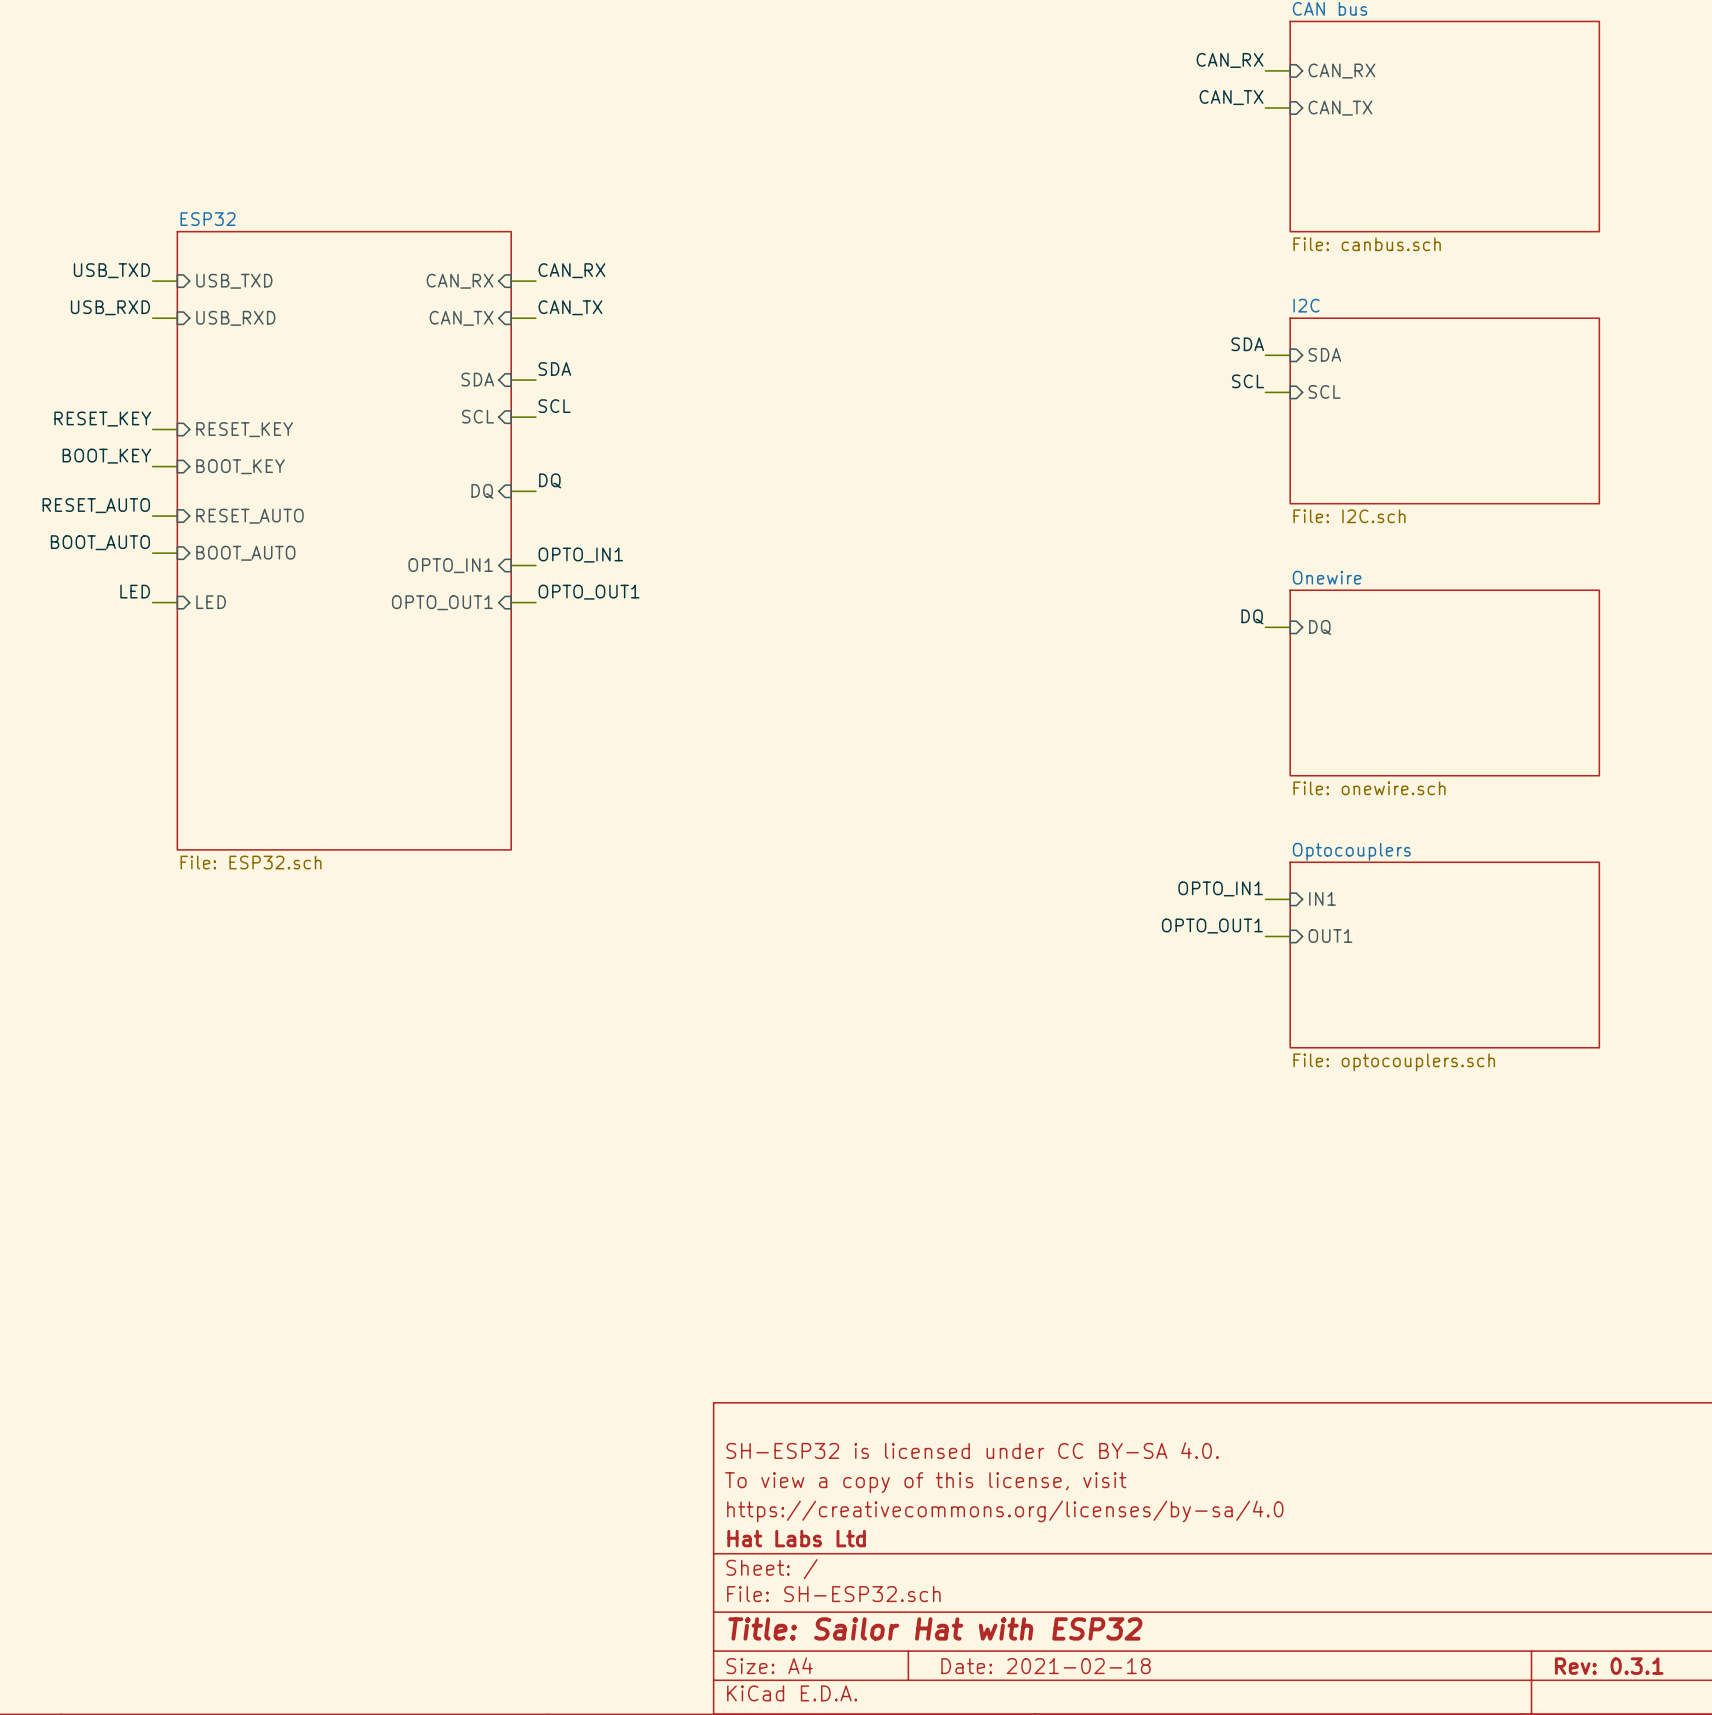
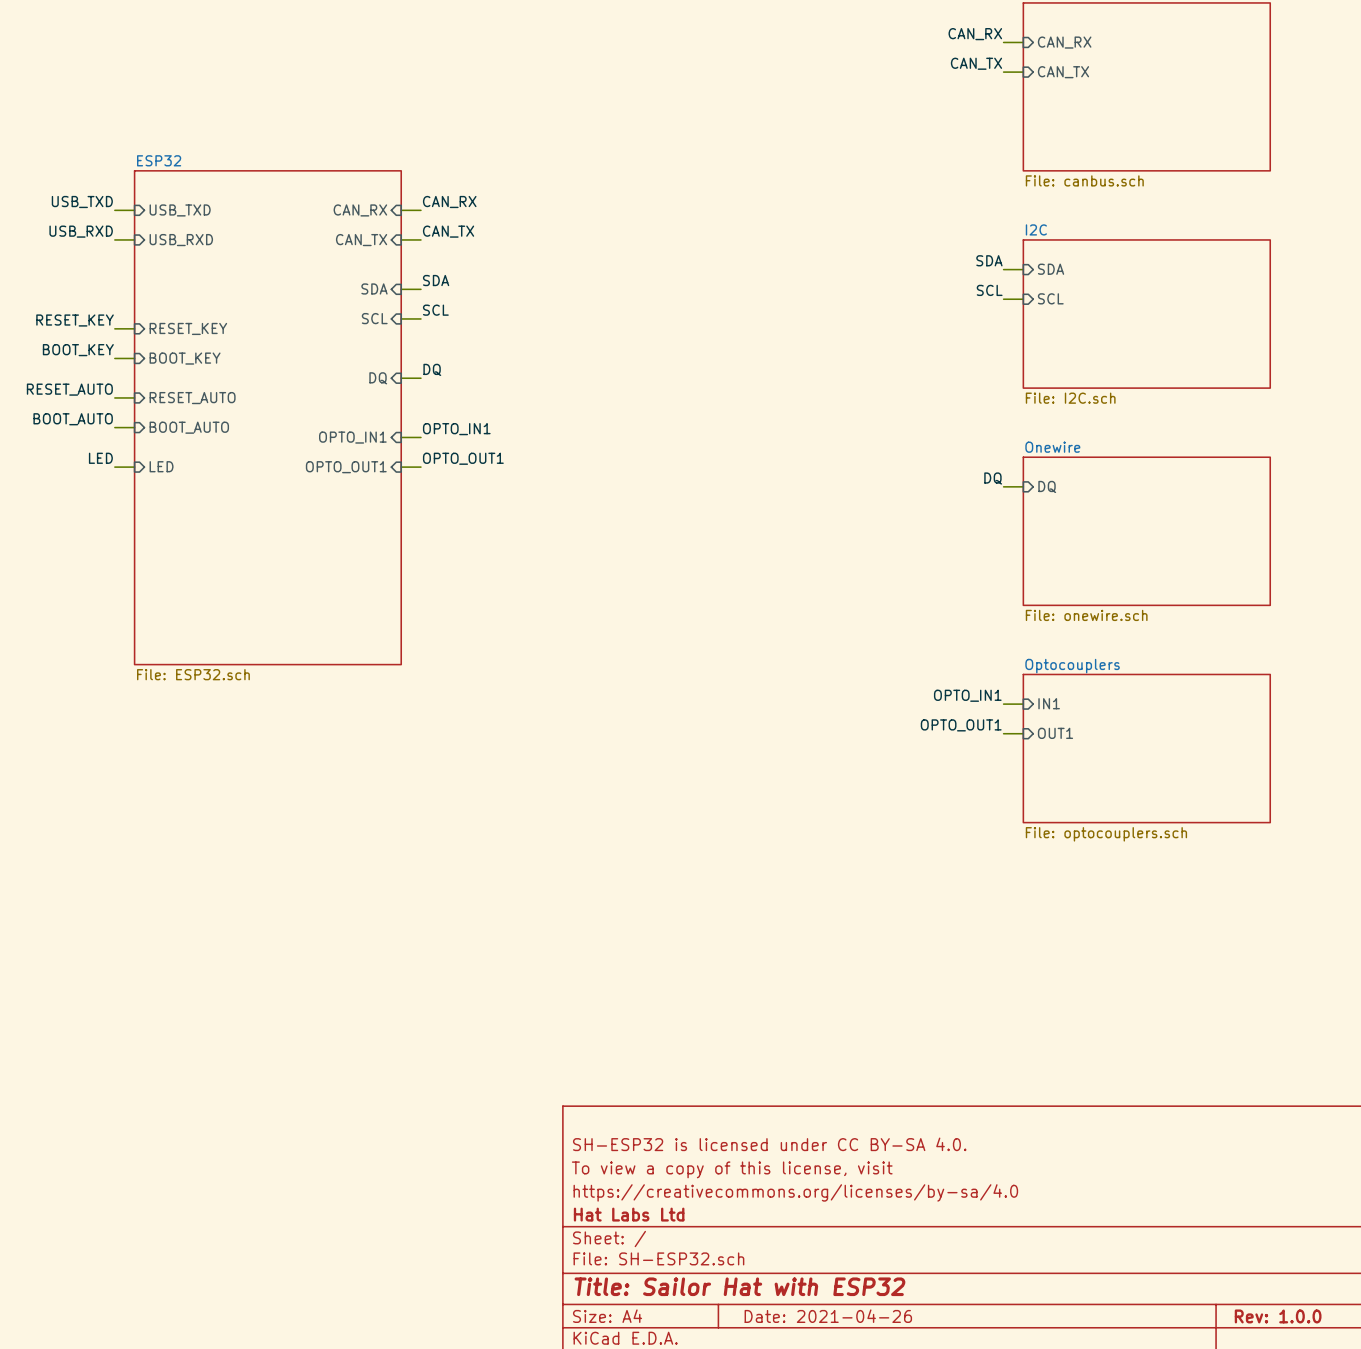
title block: Date: 2021-02-18 (1046, 1666) -> Date: 2021-04-26 (828, 1316)
title block: Rev: 0.3.1 (1609, 1666) -> Rev: 1.0.0 (1278, 1316)

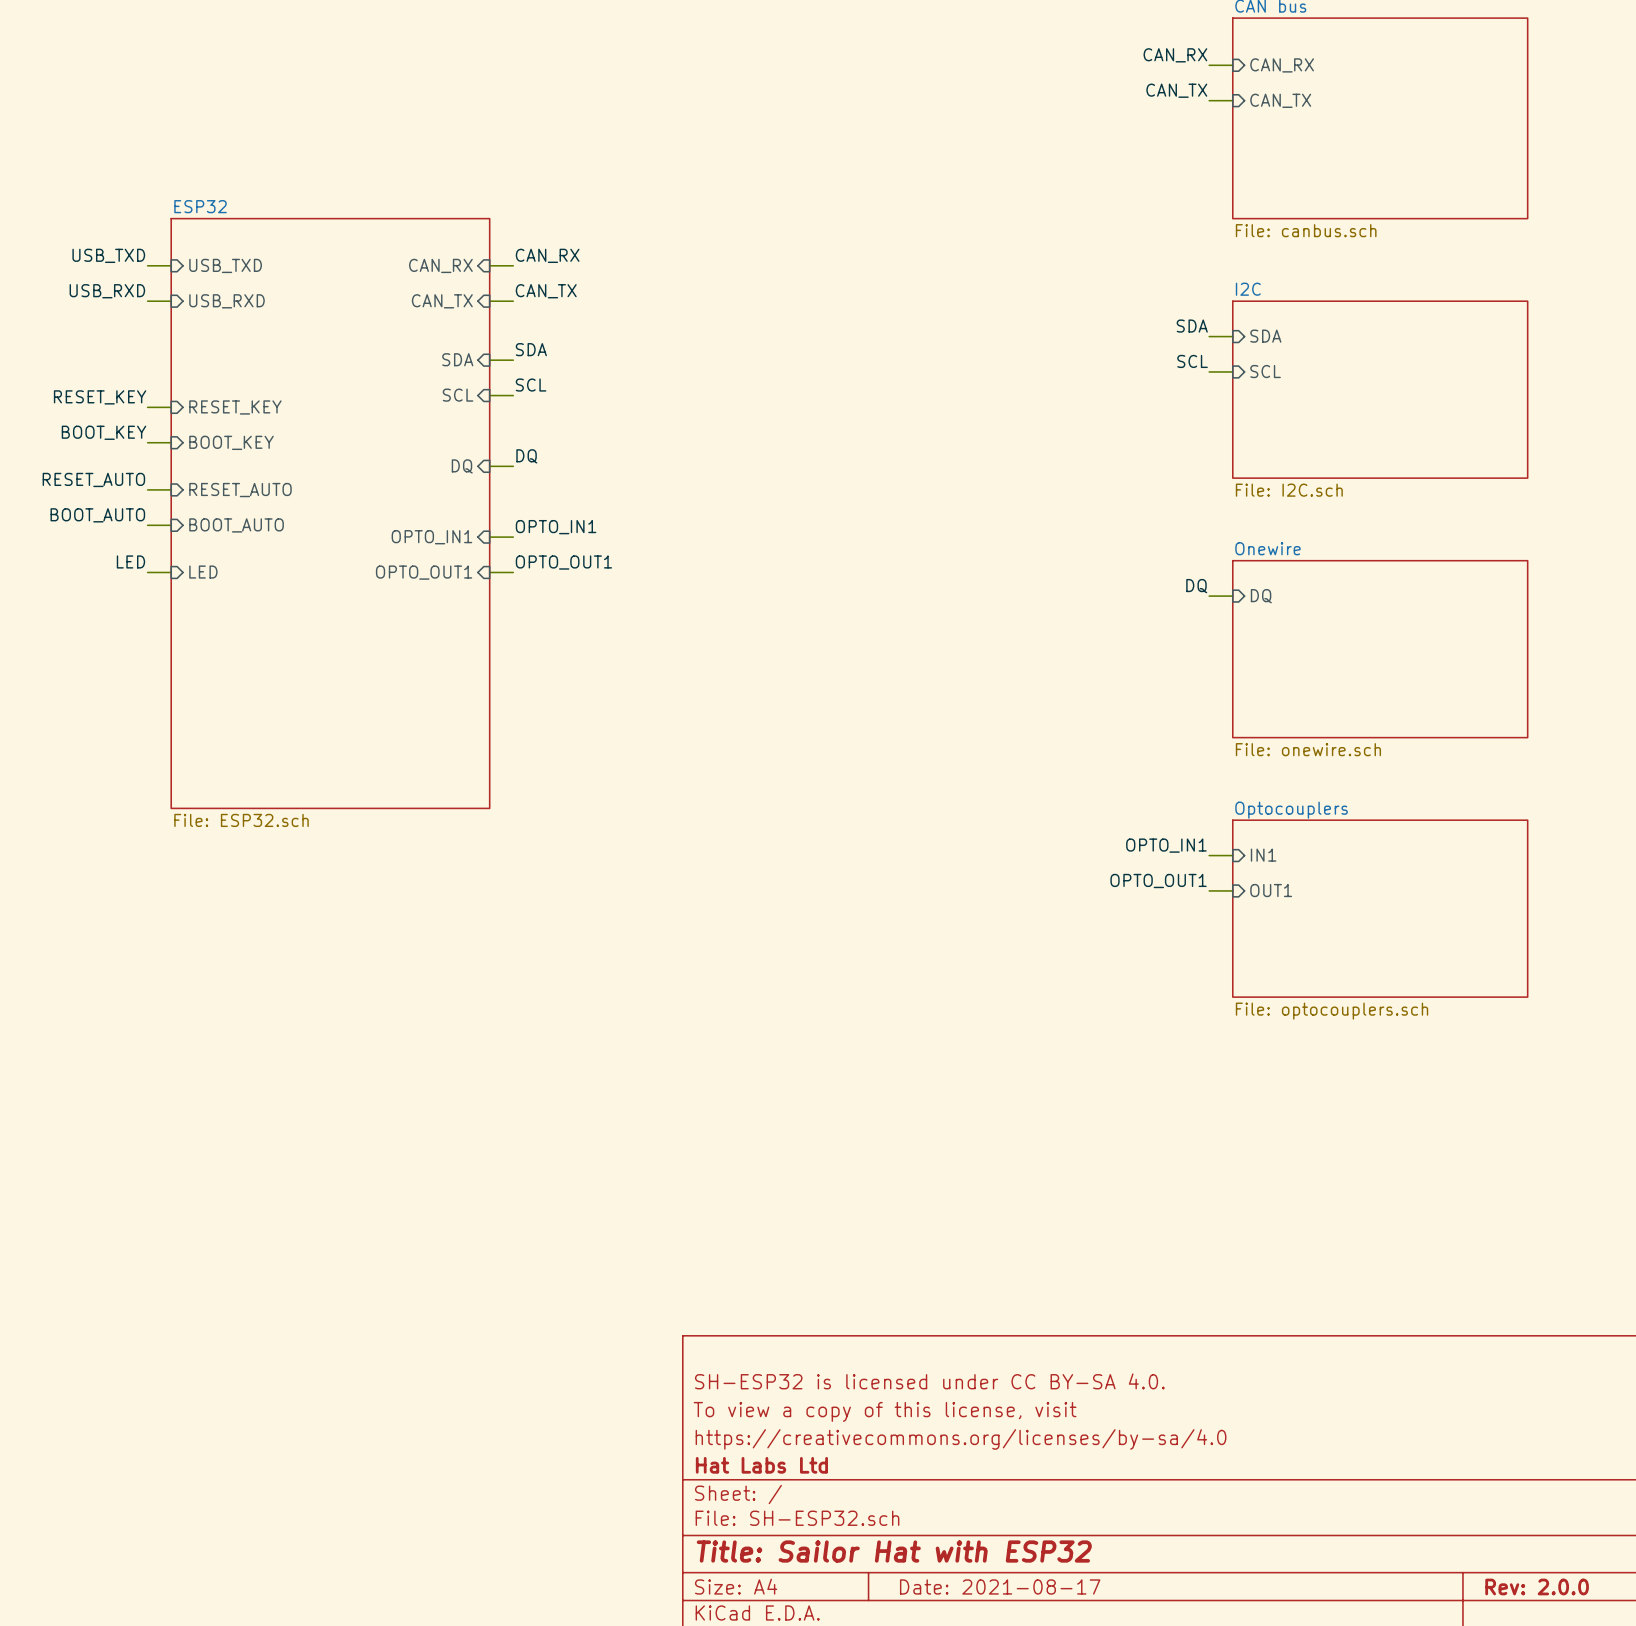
title block: Date: 2021-04-26 (828, 1316) -> Date: 2021-08-17 (1000, 1586)
title block: Rev: 1.0.0 (1278, 1316) -> Rev: 2.0.0 (1537, 1586)

